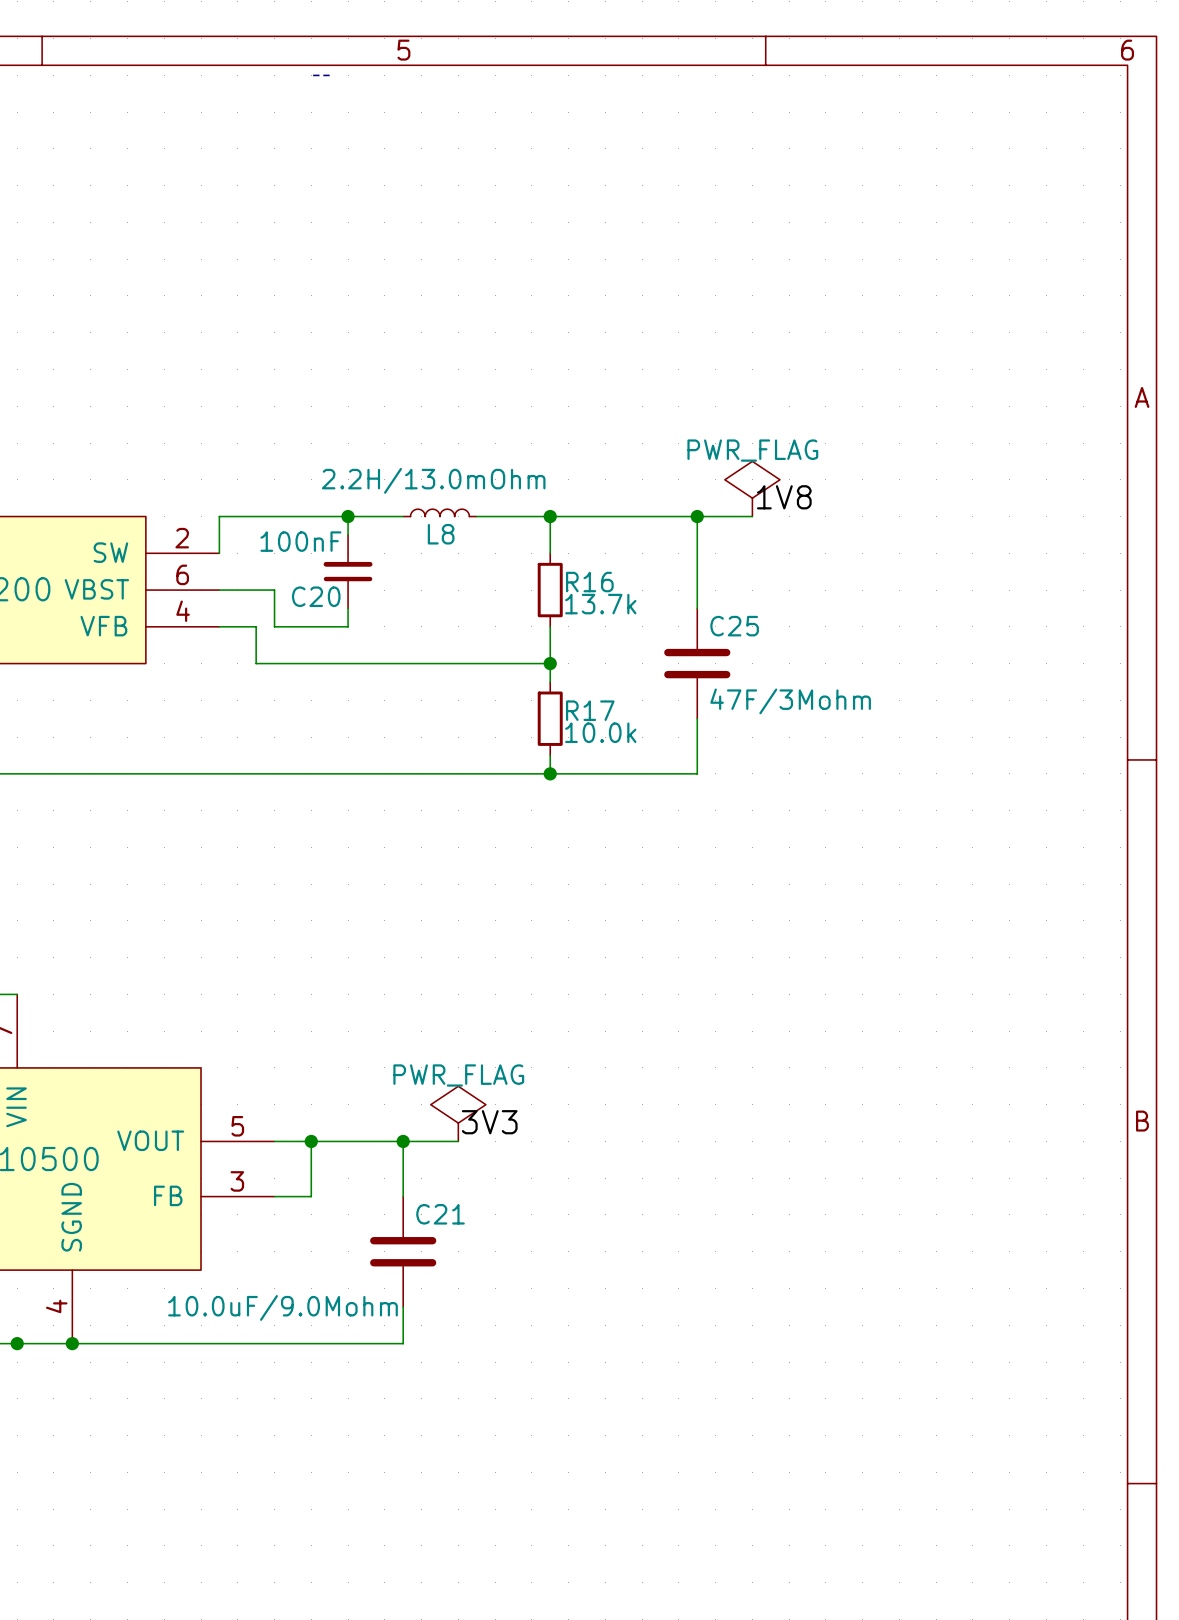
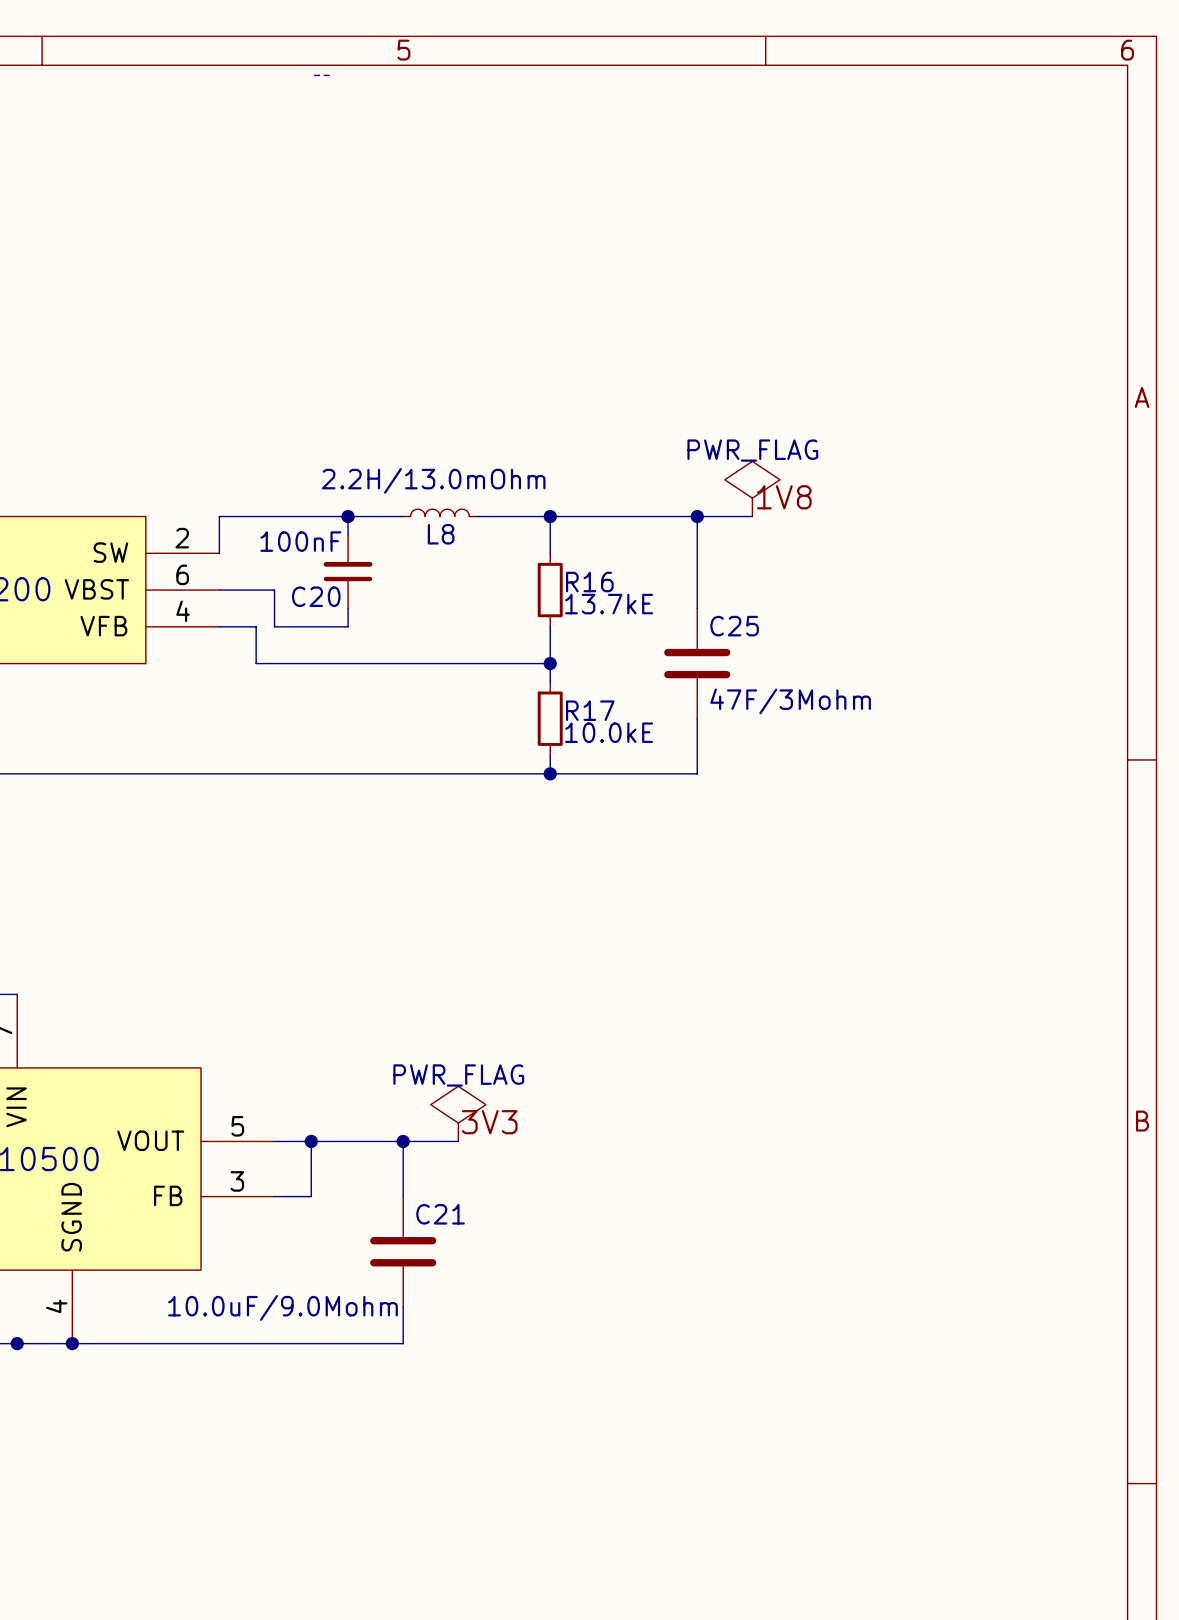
R16 value: 13.7k (600, 604) -> 13.7kE (609, 604)
R17 value: 10.0k (600, 732) -> 10.0kE (609, 732)

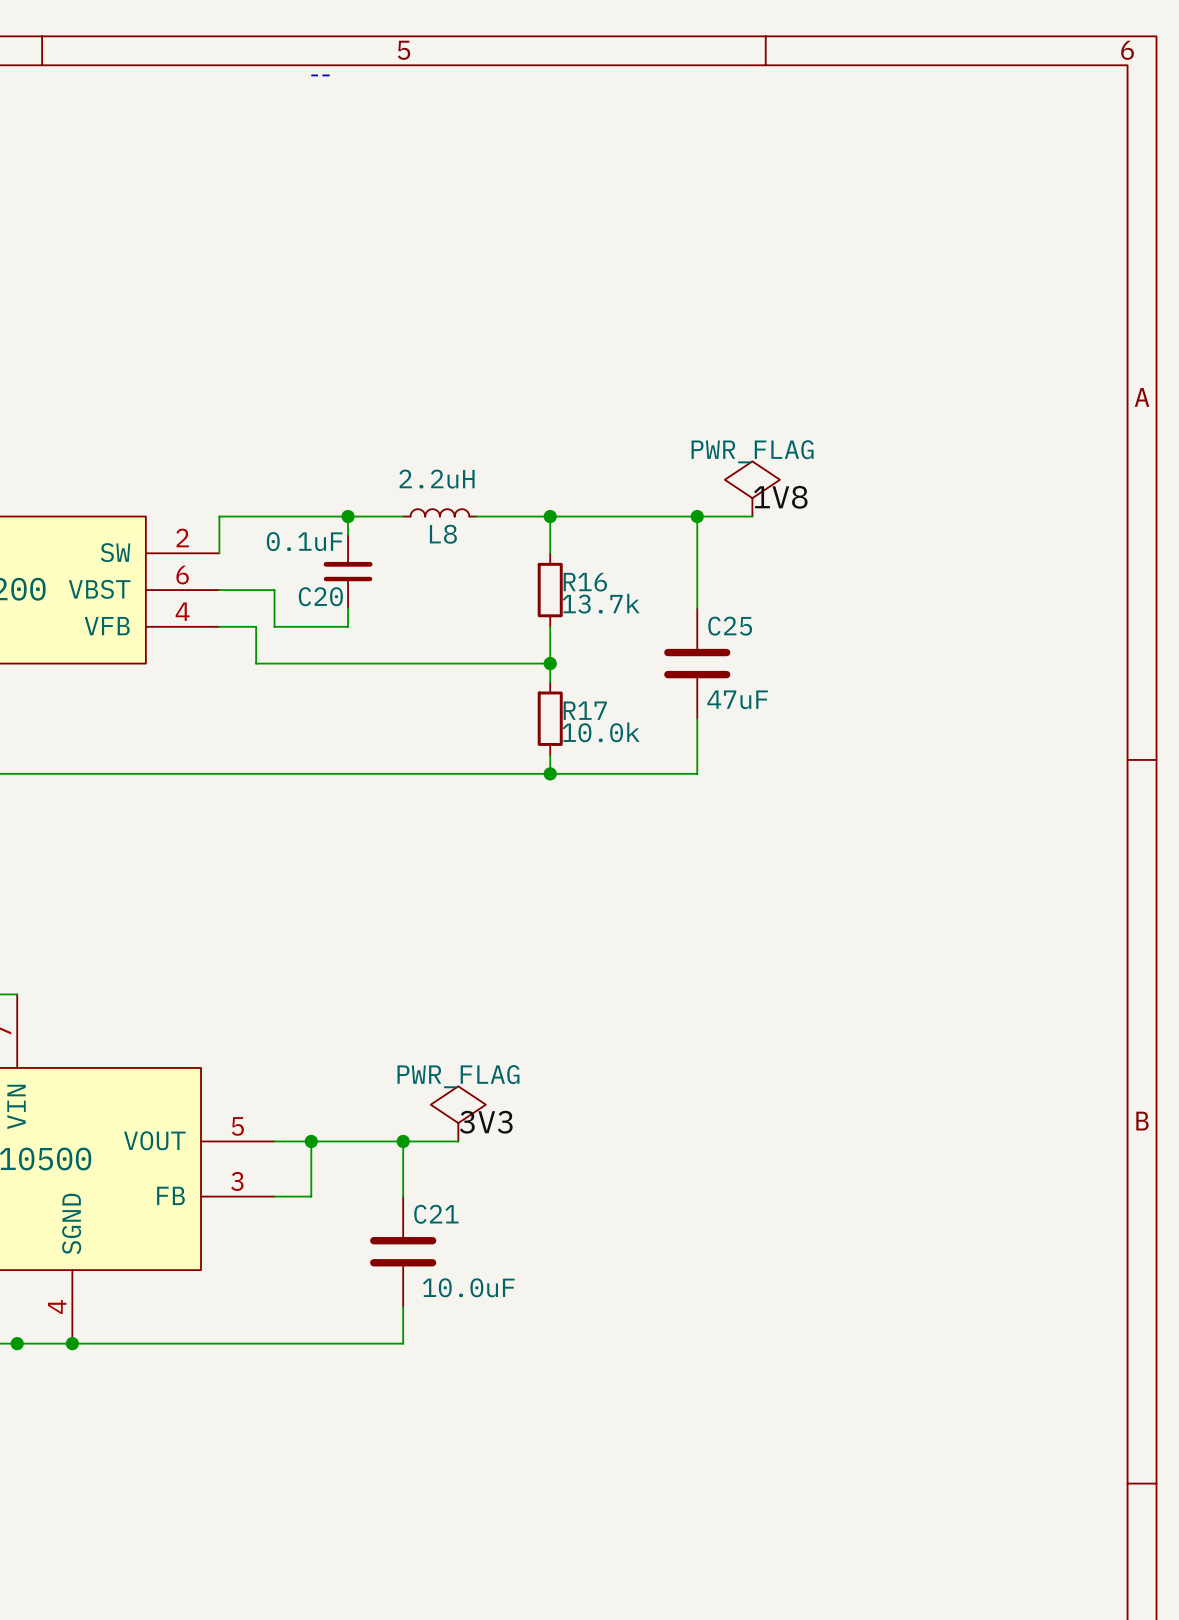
L8 value: 2.2H/13.0mOhm (433, 480) -> 2.2uH (437, 479)
C20 value: 100nF (300, 541) -> 0.1uF (304, 541)
R16 value: 13.7kE (609, 604) -> 13.7k (601, 603)
C25 value: 47F/3Mohm (790, 701) -> 47uF (737, 699)
R17 value: 10.0kE (609, 732) -> 10.0k (601, 732)
C21 value: 10.0uF/9.0Mohm (282, 1307) -> 10.0uF (468, 1287)

